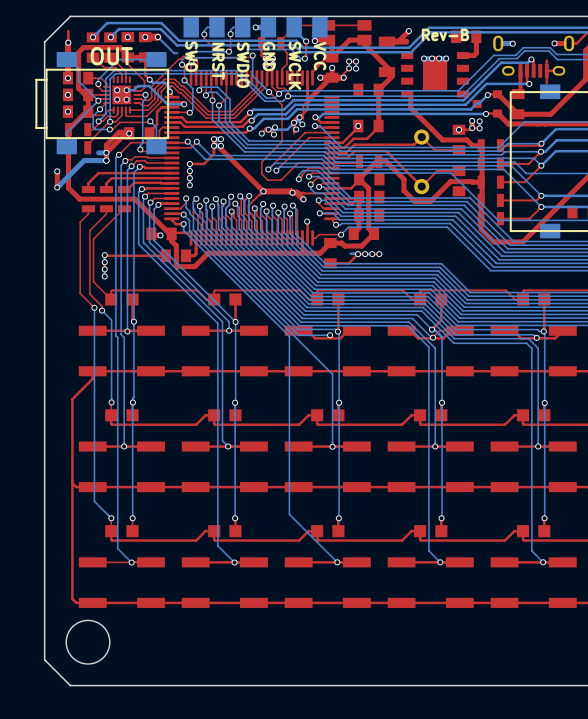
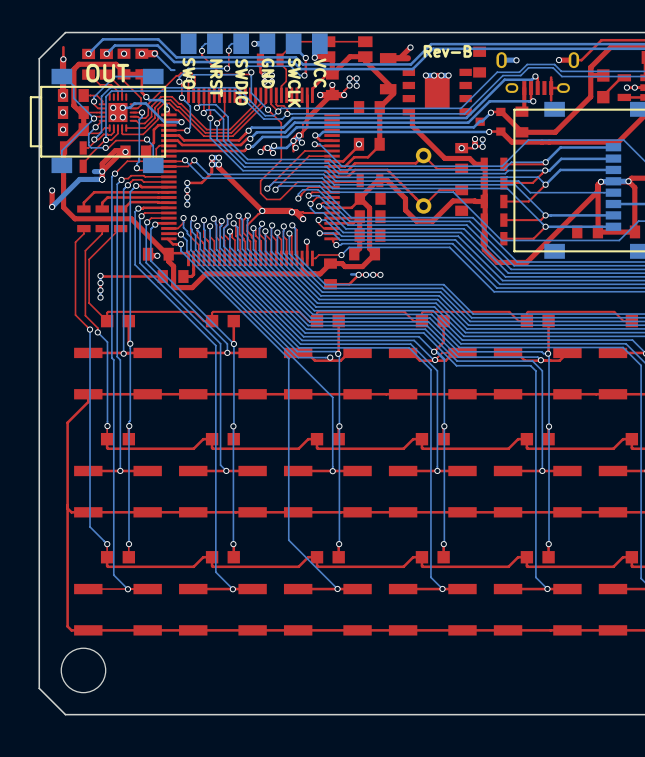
part rotation: 0° (466, 36) -> 90° clockwise (479, 62)
top track: (476, 36) (476, 53) (474, 55) (462, 55) -> none

